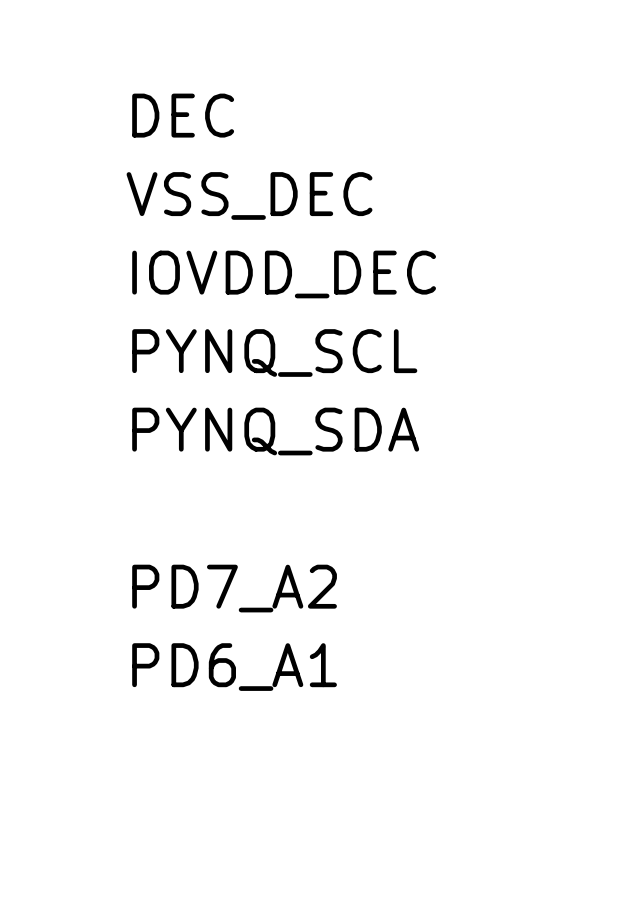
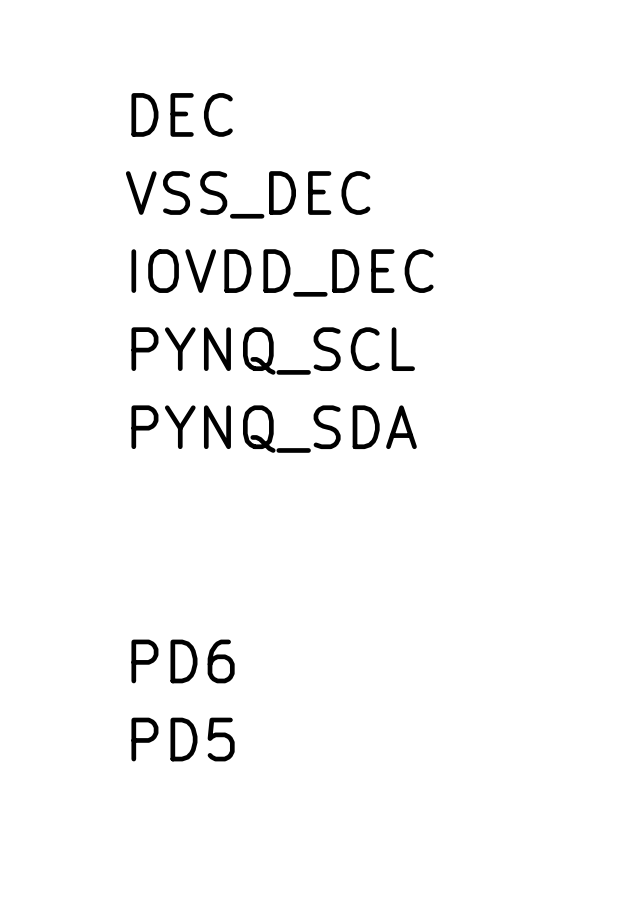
label: PD7_A2 (234, 588) -> none
label: PD6_A1 (234, 667) -> PD6 (183, 661)
label: none -> PD5 (183, 739)

